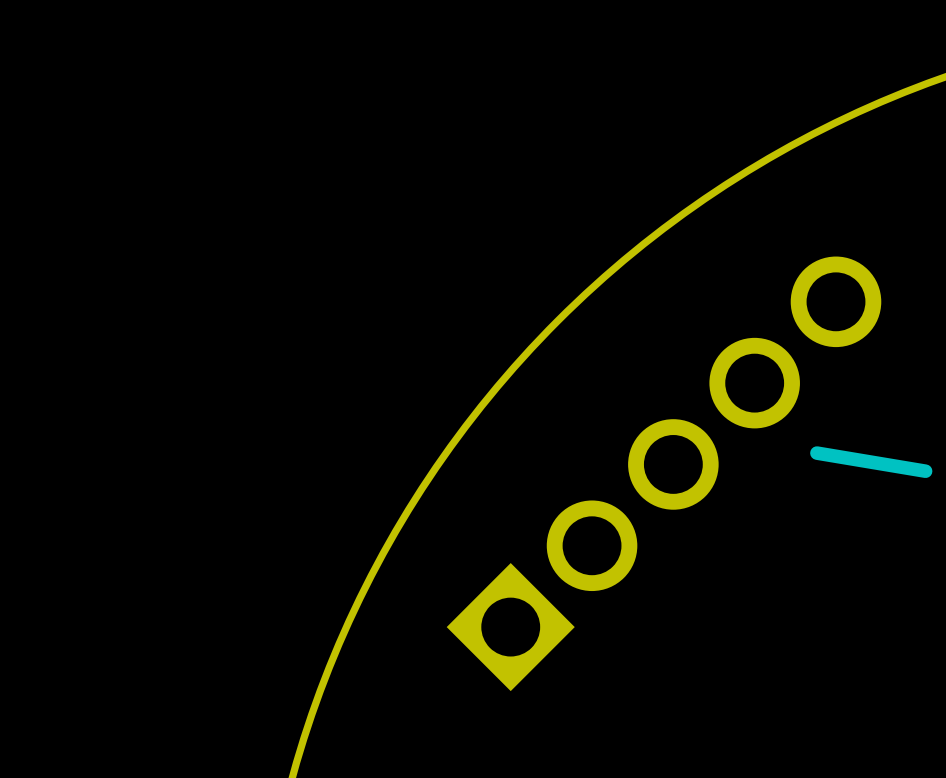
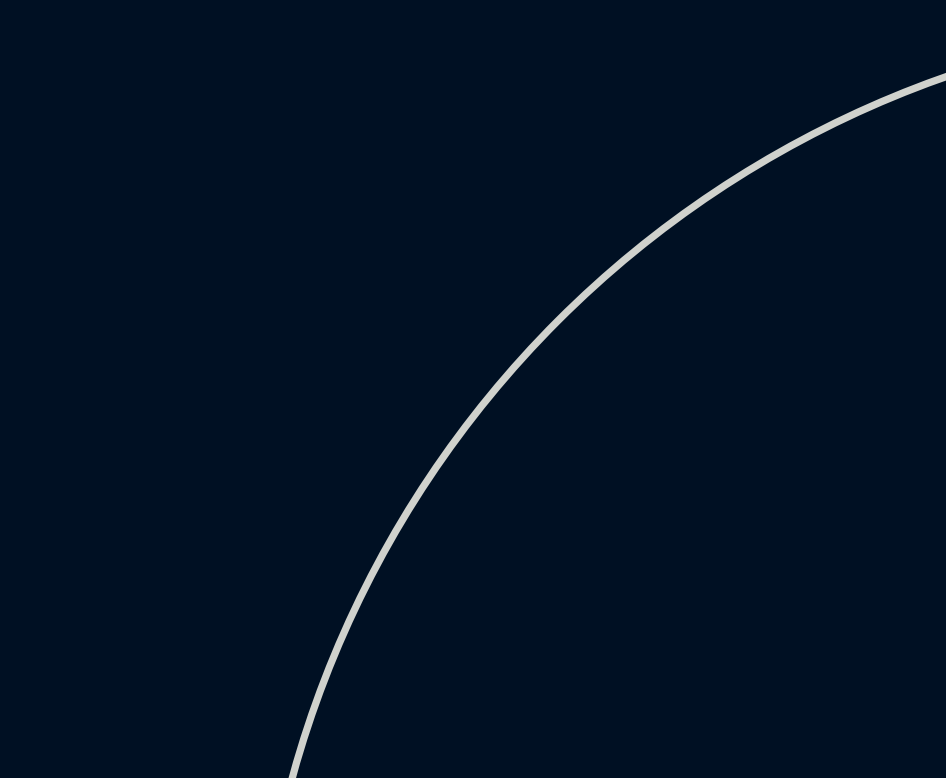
line: (816, 453) (925, 471) -> none
part: (663, 473) -> none

